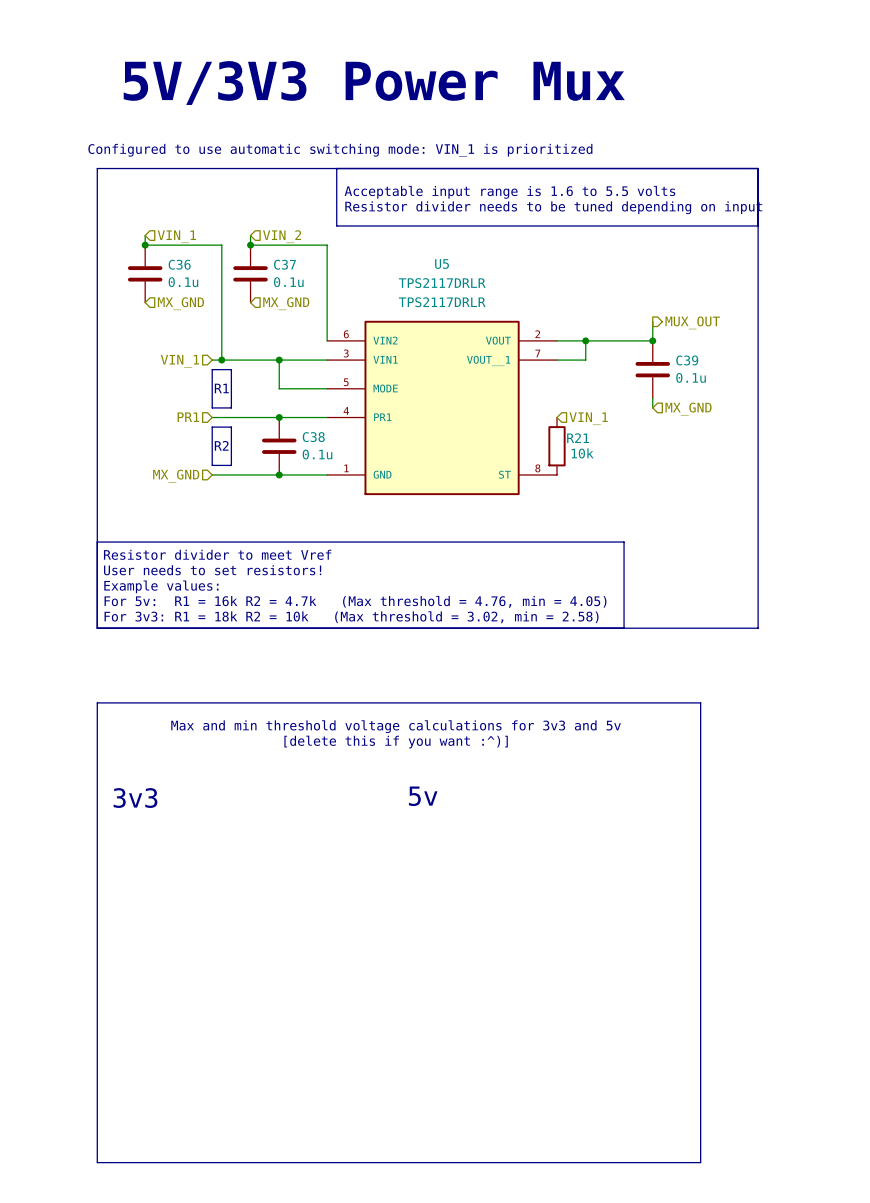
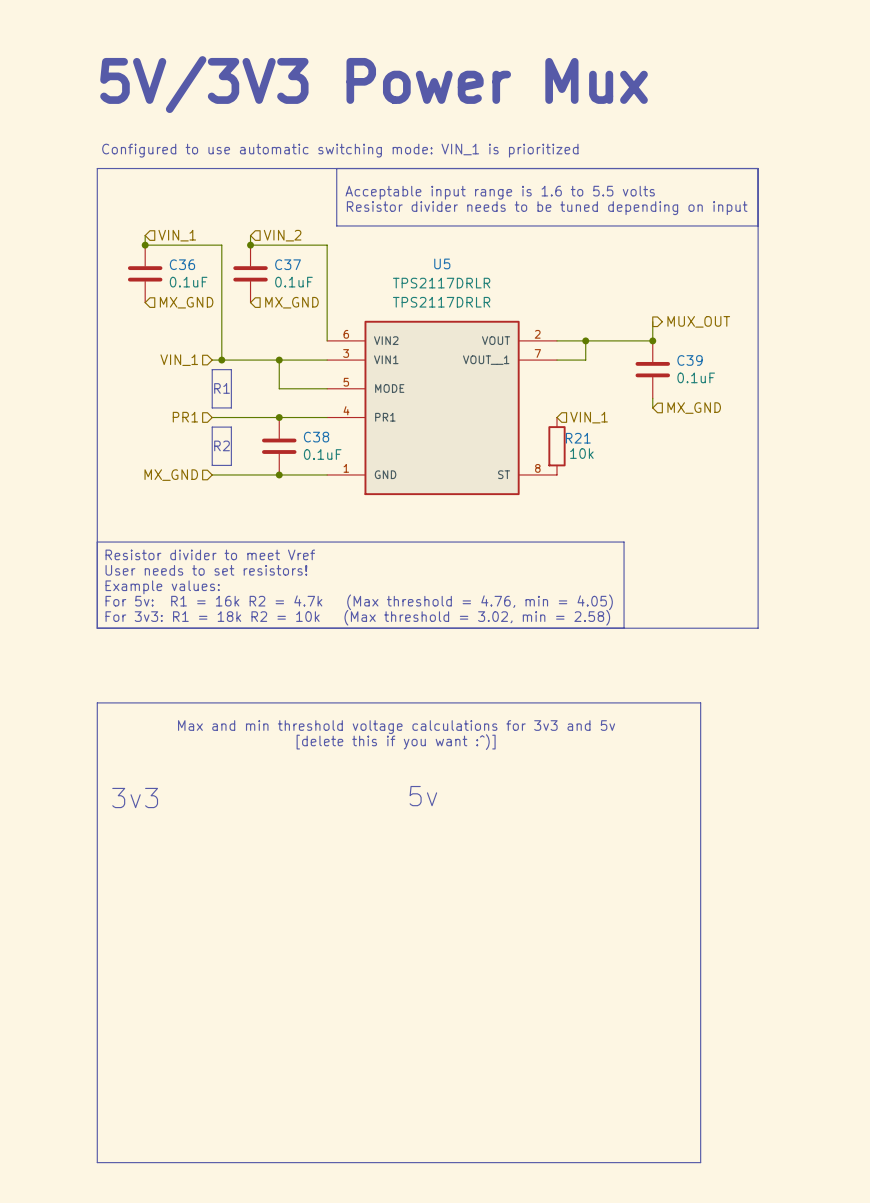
C36 value: 0.1u (183, 282) -> 0.1uF (188, 282)
C37 value: 0.1u (288, 282) -> 0.1uF (293, 282)
C39 value: 0.1u (691, 377) -> 0.1uF (696, 377)
C38 value: 0.1u (317, 454) -> 0.1uF (322, 454)

